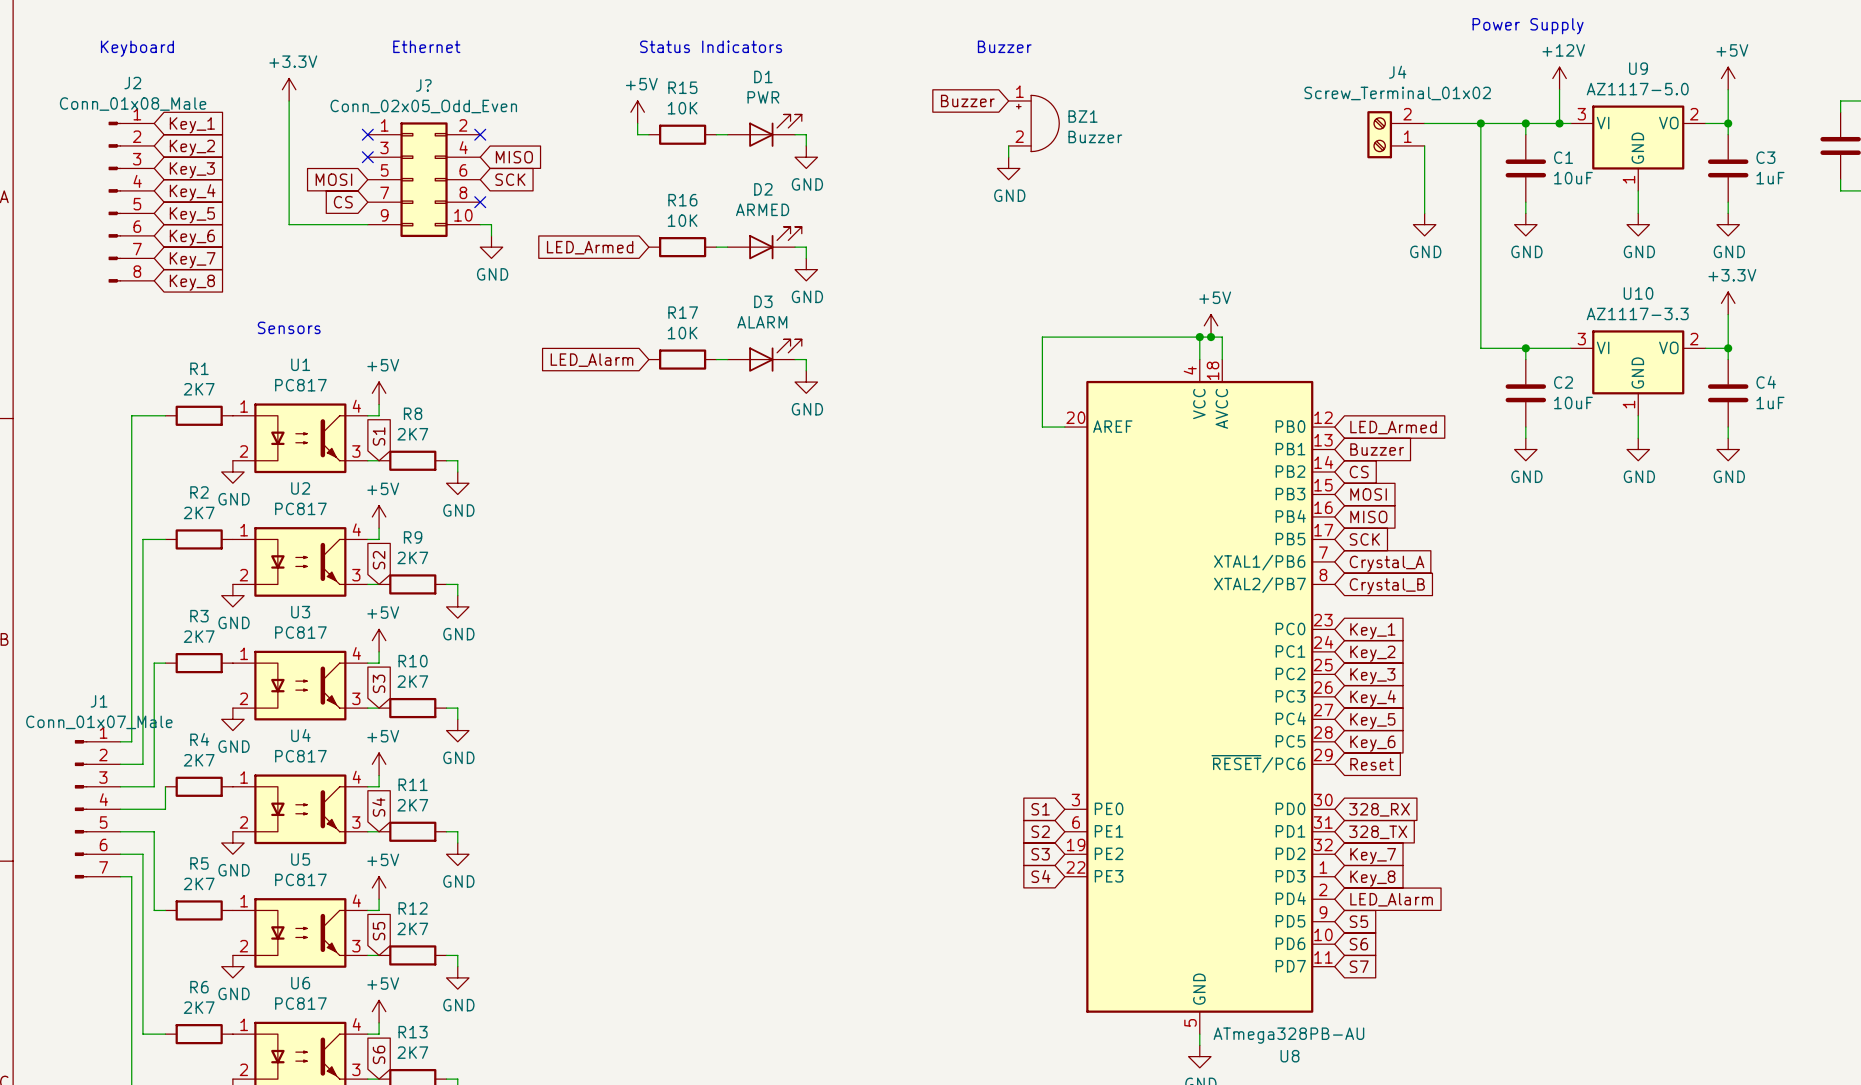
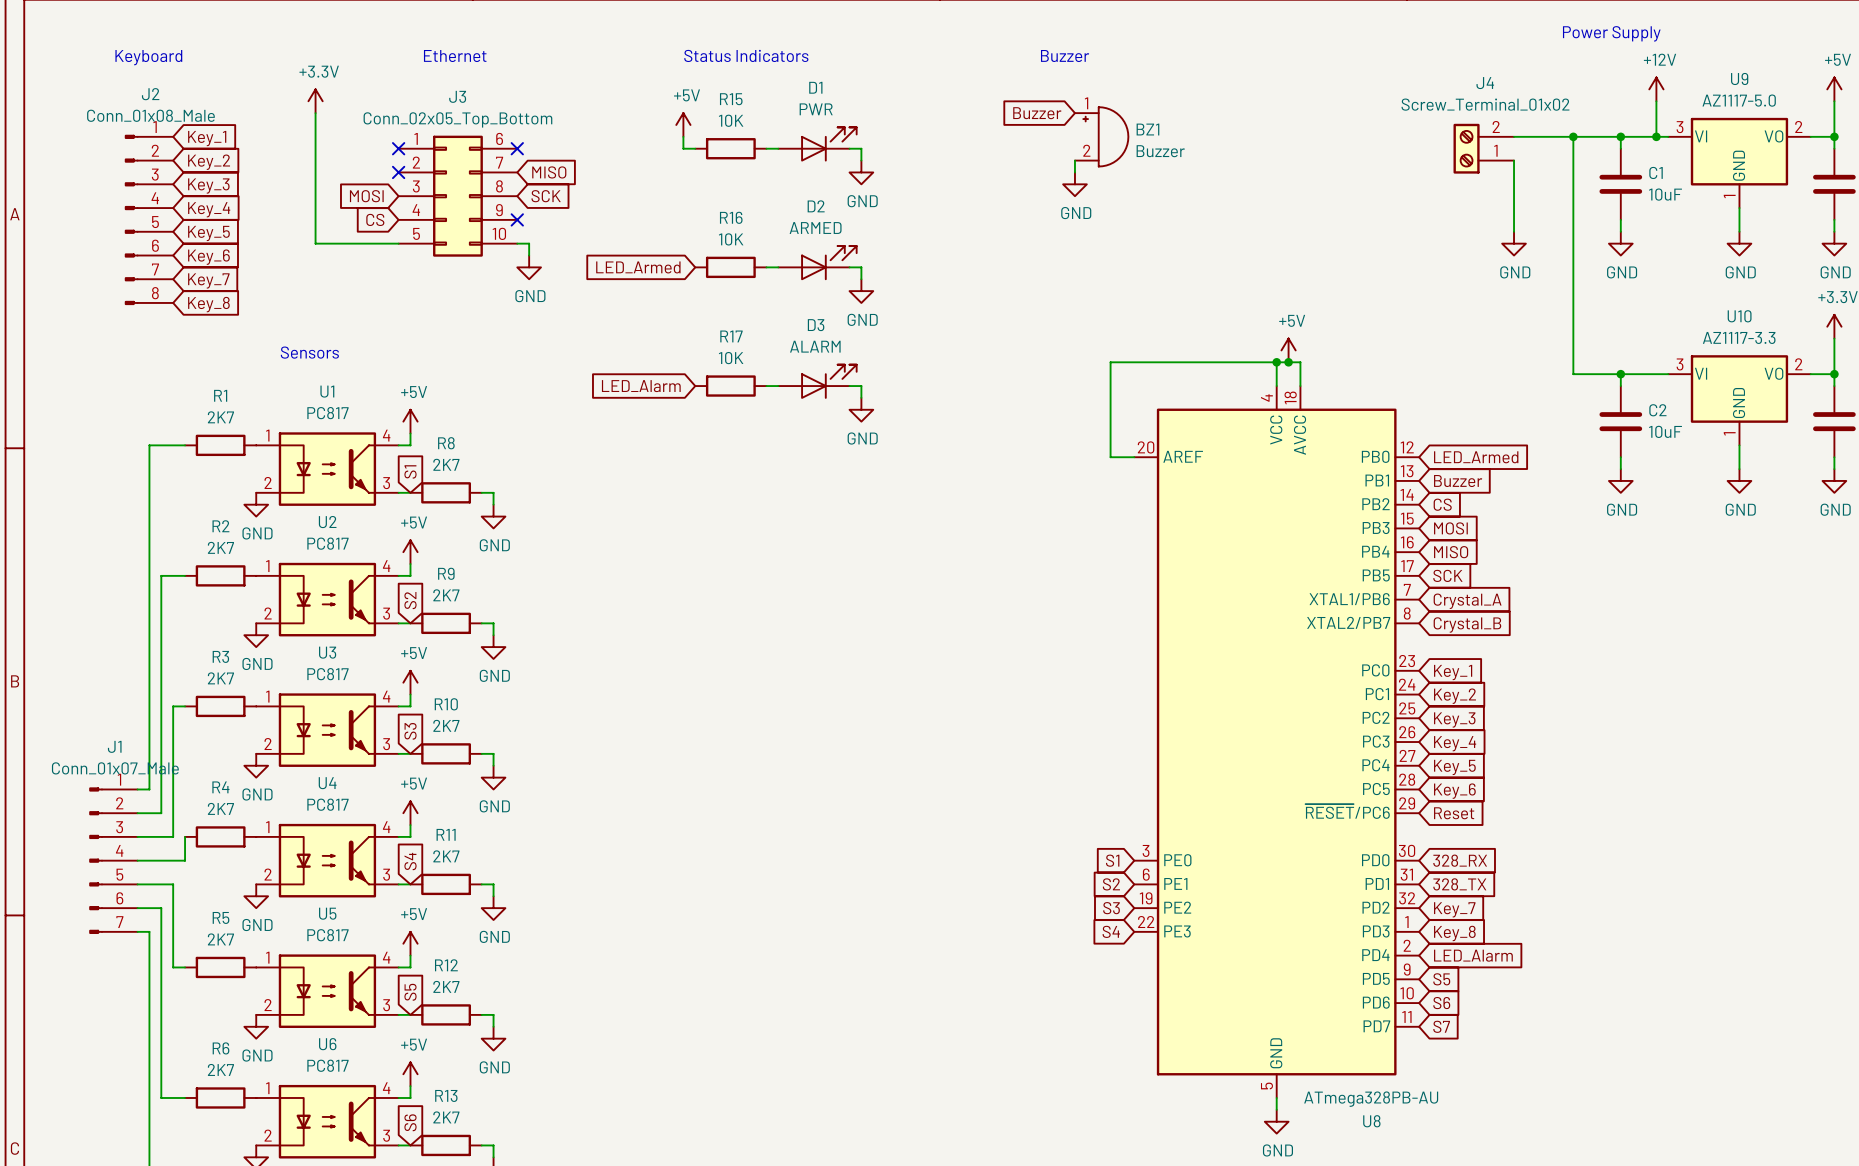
J? name: J? (423, 85) -> J3 (457, 96)
J? value: Conn_02x05_Odd_Even (423, 106) -> Conn_02x05_Top_Bottom (457, 119)
J? pin number: 2 (463, 125) -> 6 (499, 138)
J? pin number: 3 (384, 147) -> 2 (416, 162)
J? pin number: 4 (463, 147) -> 7 (499, 162)
J? pin number: 5 (384, 170) -> 3 (416, 186)
J? pin number: 6 (463, 170) -> 8 (499, 186)
J? pin number: 7 (384, 192) -> 4 (416, 210)
J? pin number: 8 (463, 192) -> 9 (499, 210)
J? pin number: 9 (384, 215) -> 5 (416, 233)

